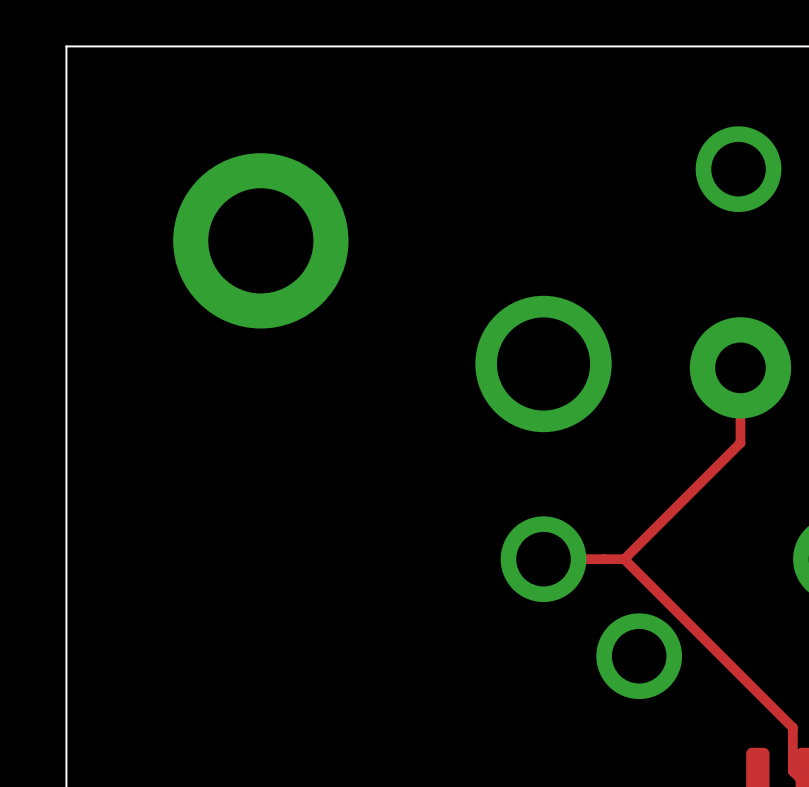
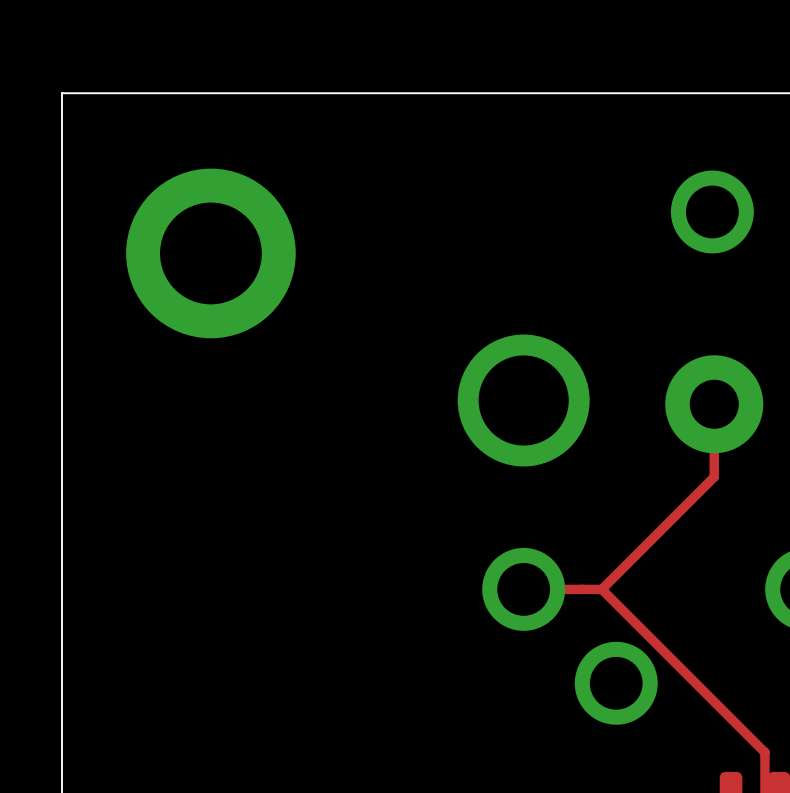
part position: (260, 240) -> (210, 253)

